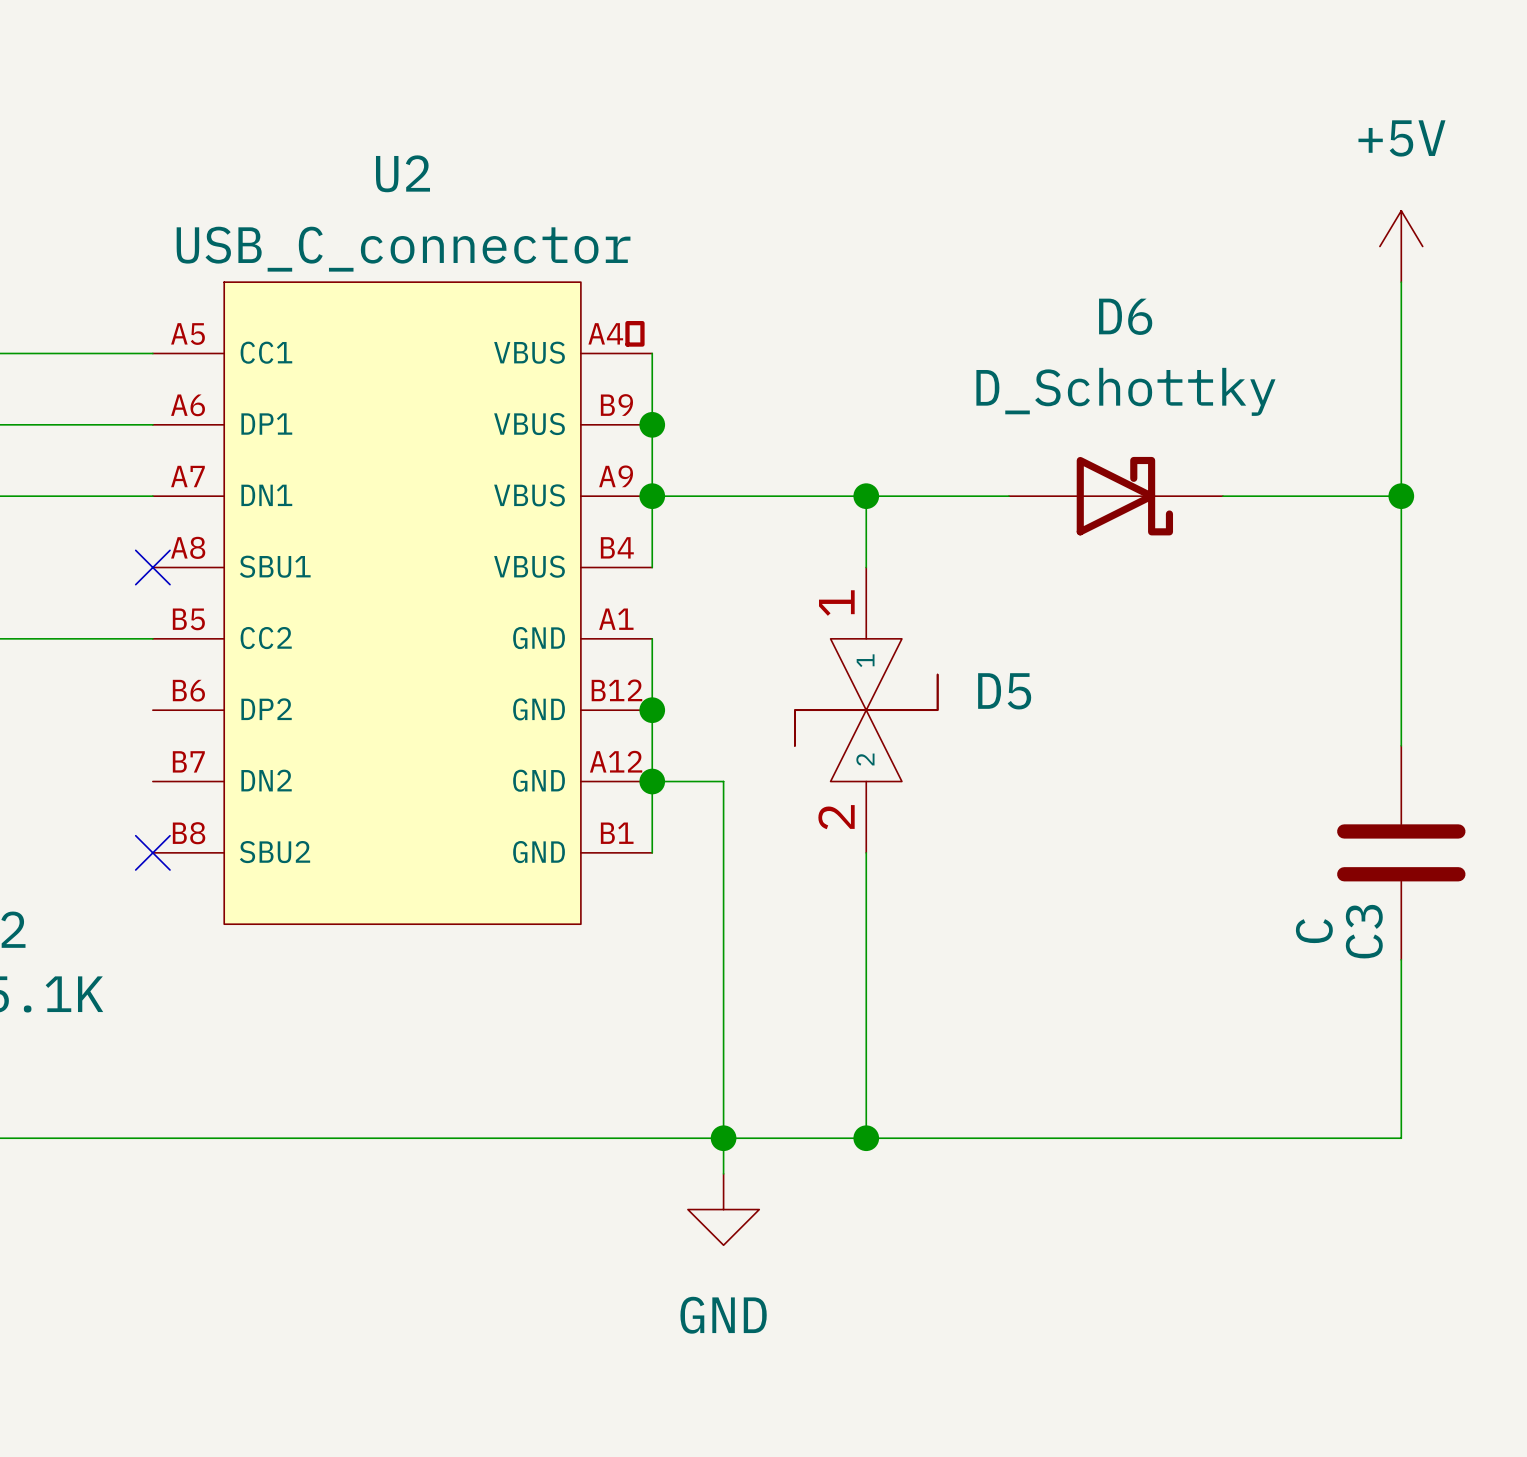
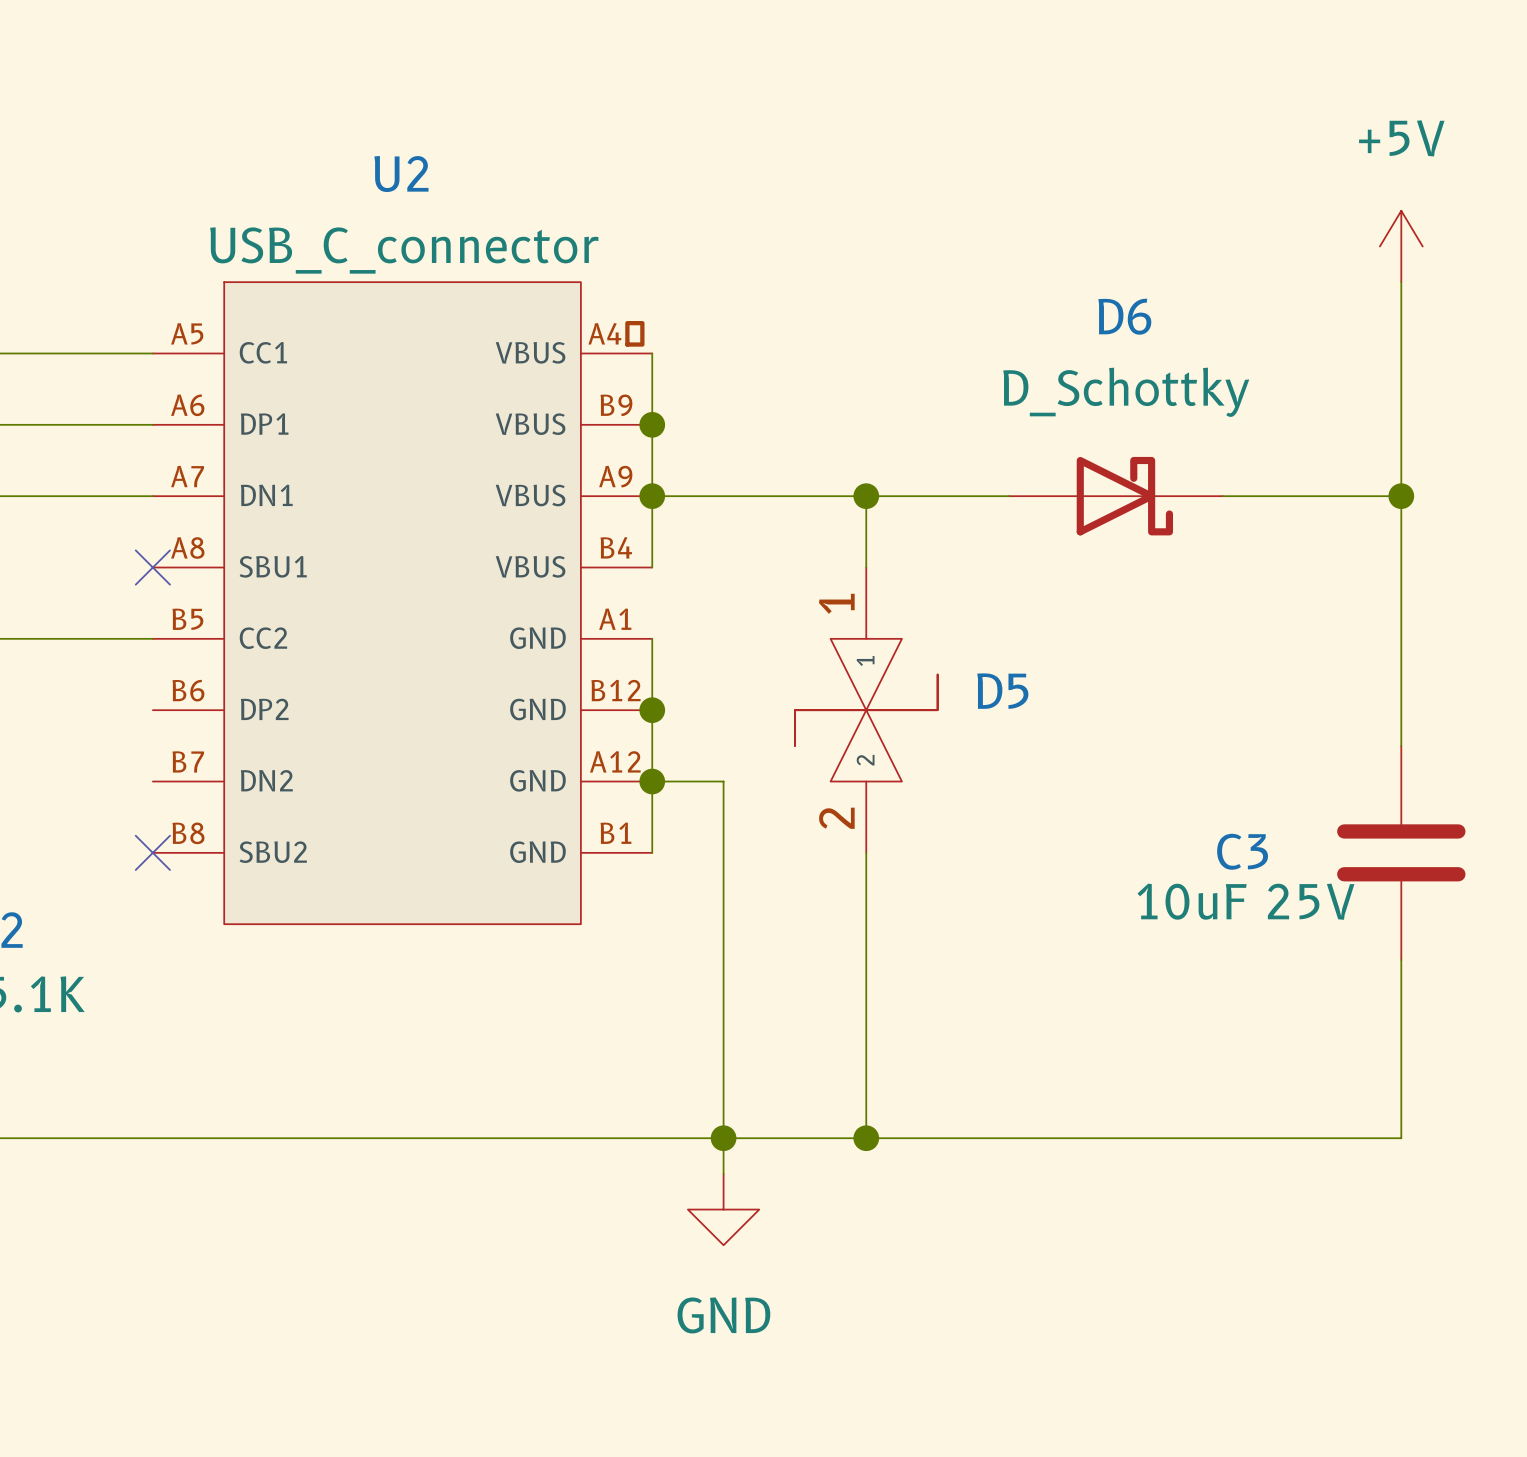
C3 value: C (1314, 931) -> 10uF 25V (1245, 901)
C3 name rotation: 0° (1364, 931) -> 90° clockwise (1242, 851)
C3 name position: C3 (1364, 931) -> C3 (1242, 851)

